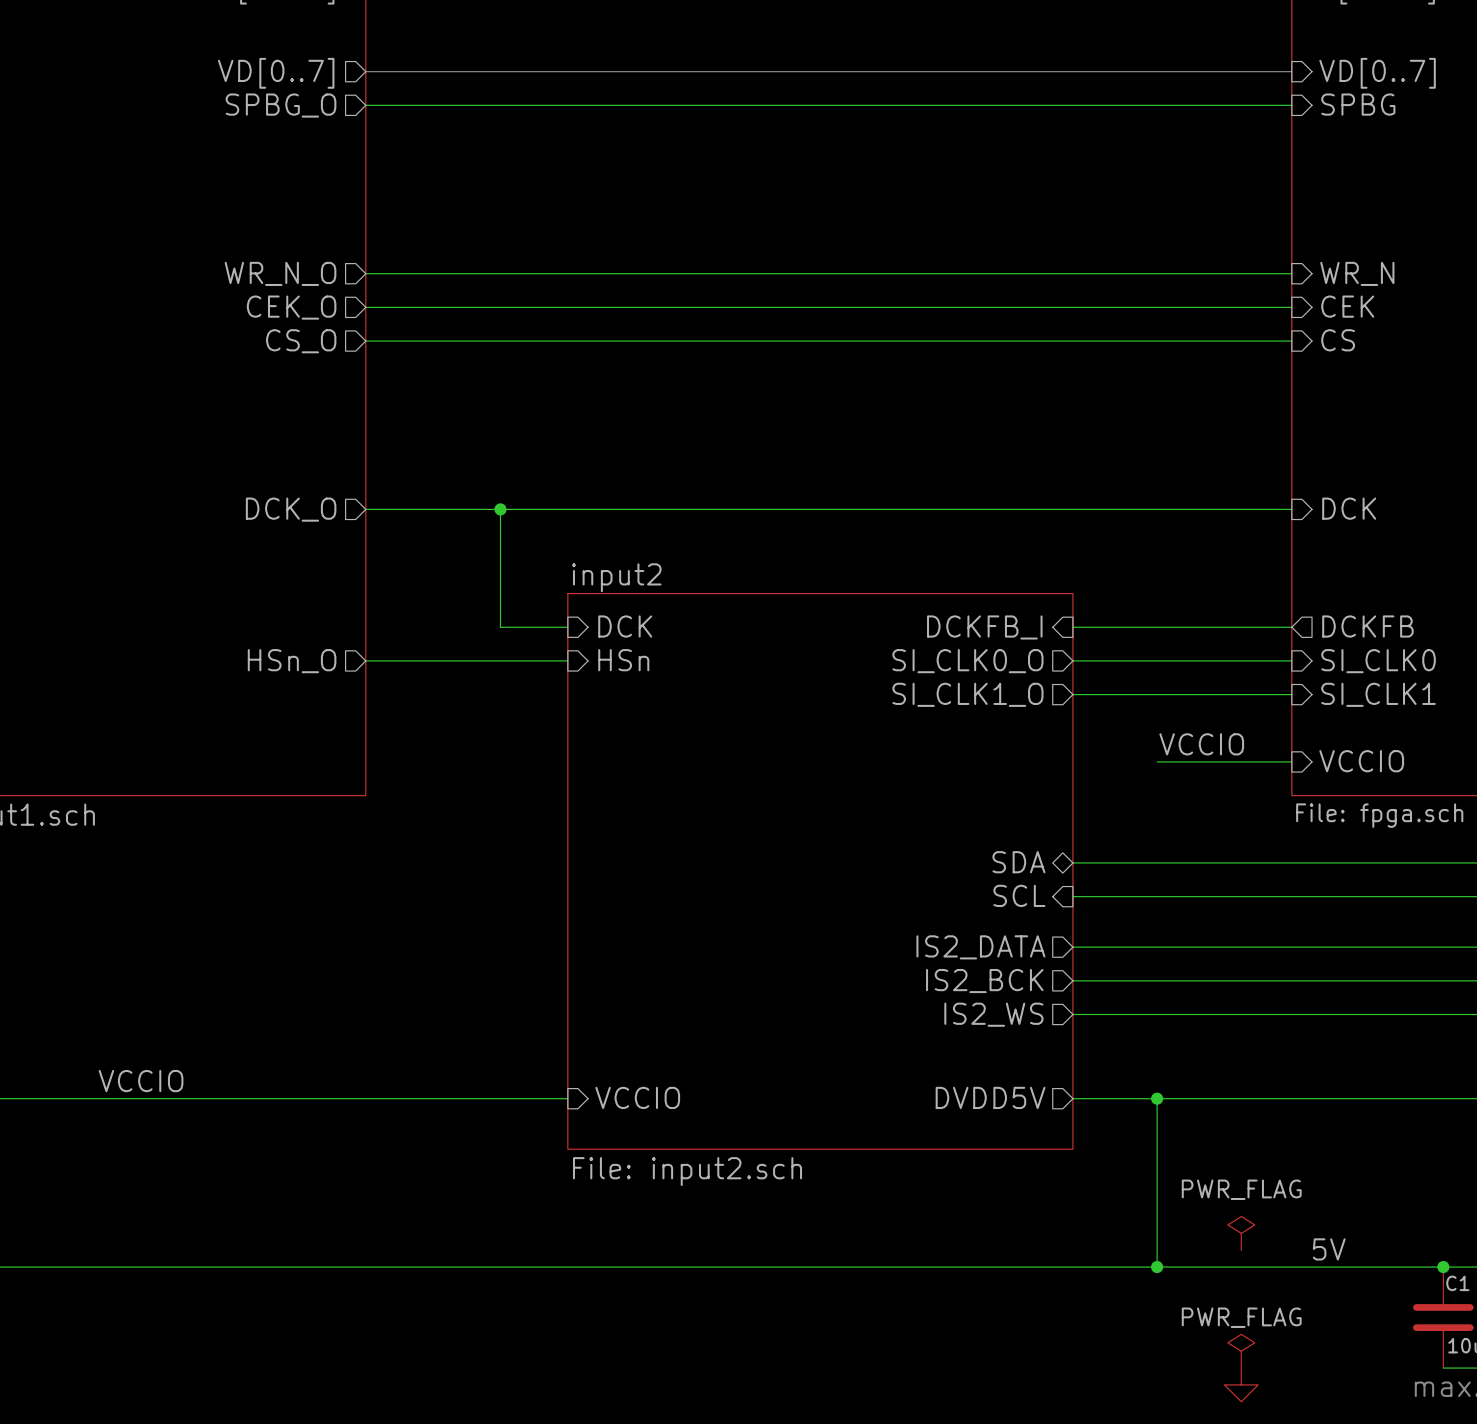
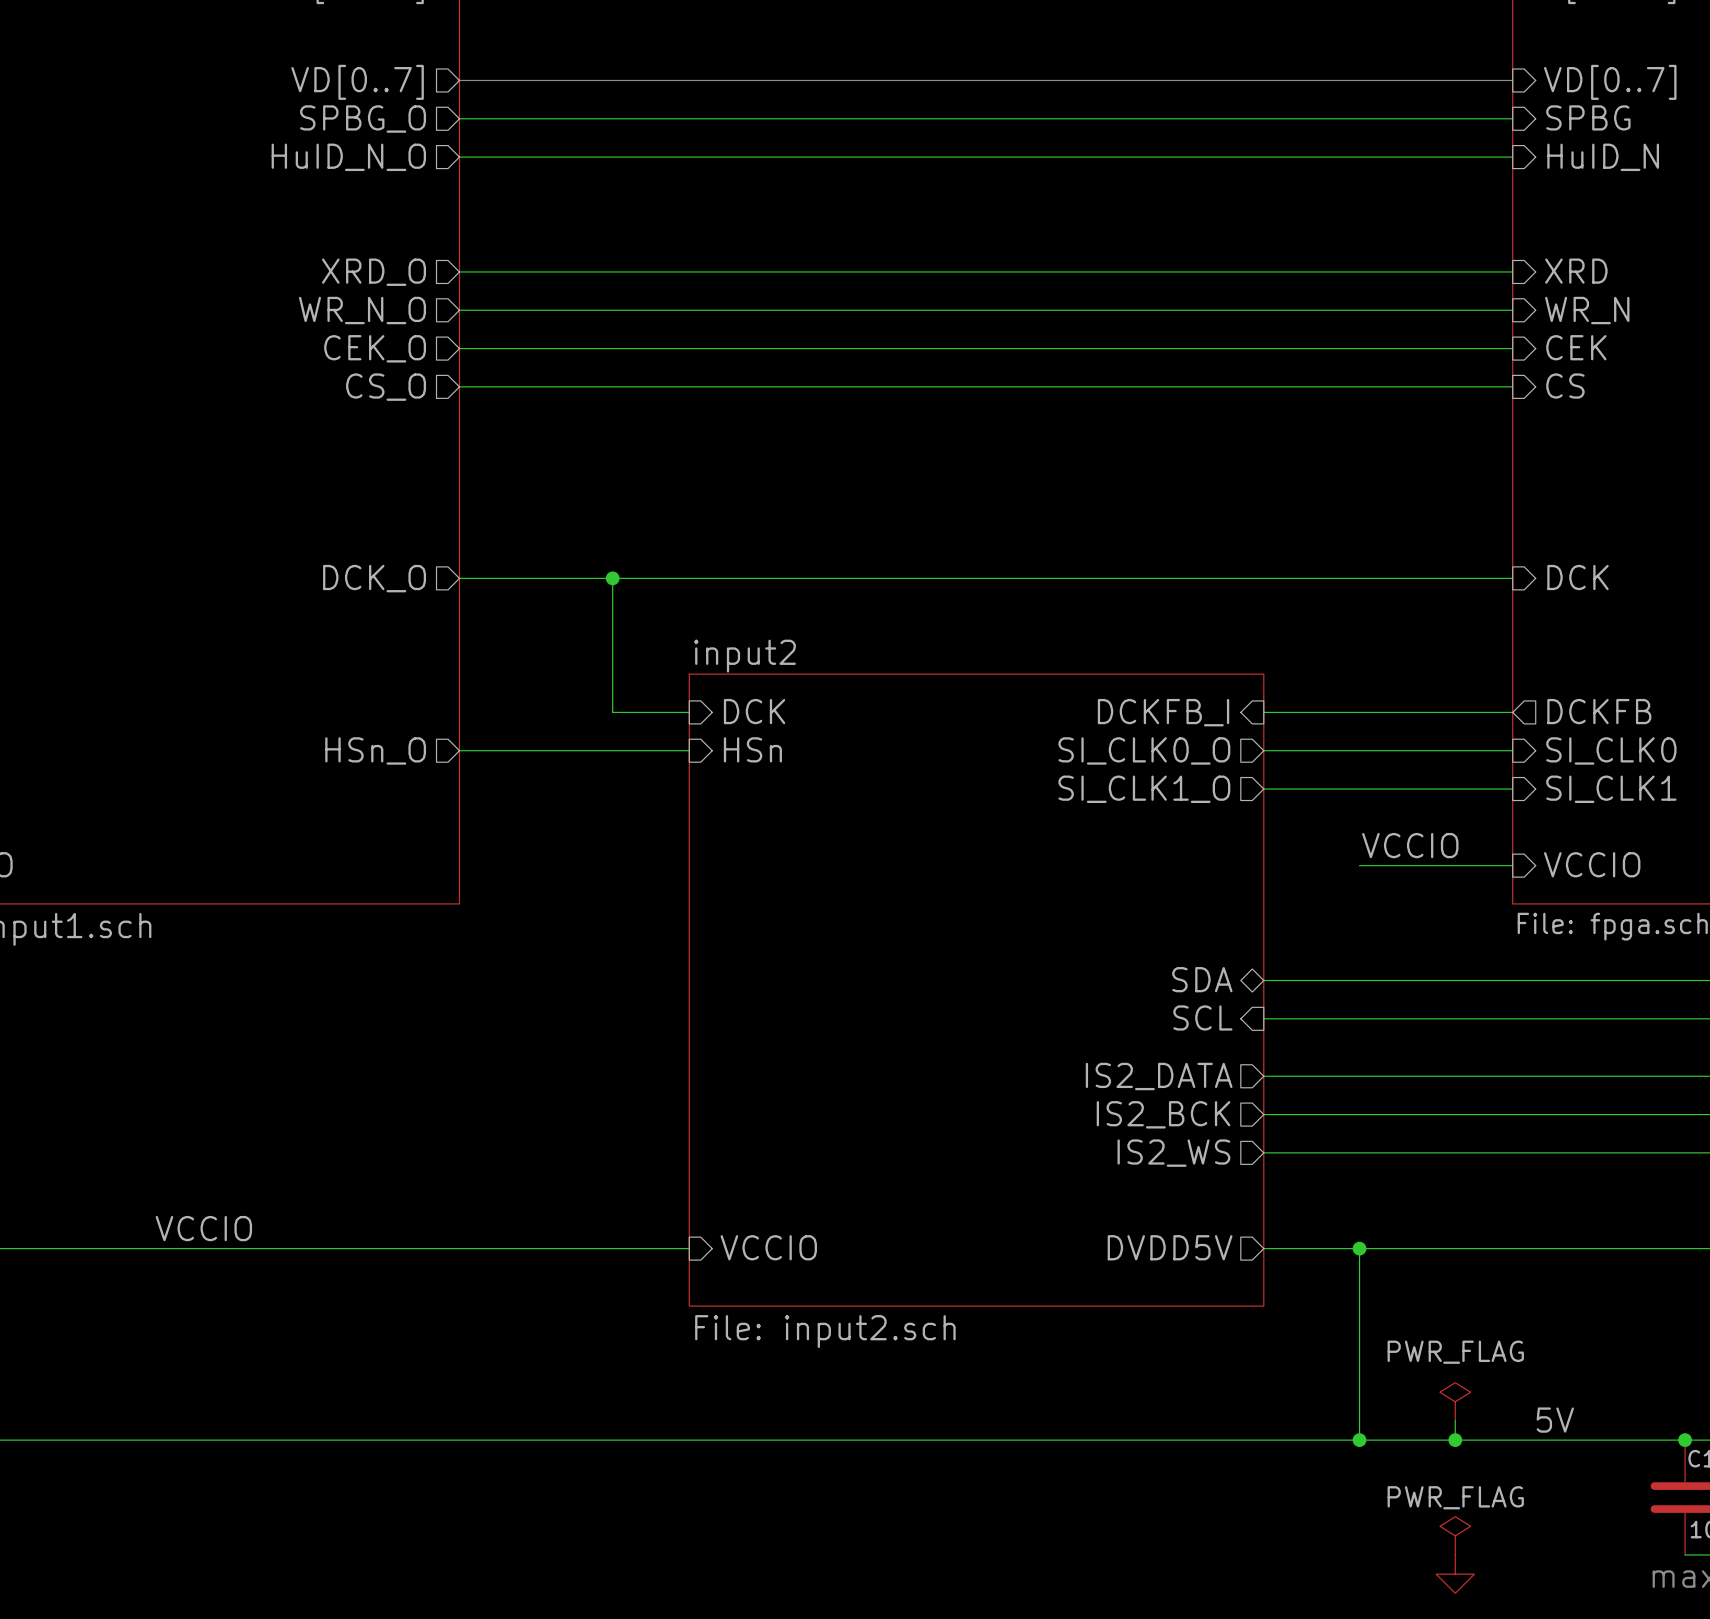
sheet pin: none -> HuID_N_O (348, 157)
wire: none -> (459, 157) (1512, 157)
sheet pin: none -> HuID_N (1603, 157)
sheet pin: none -> XRD (1576, 271)
sheet pin: none -> XRD_O (374, 272)
wire: none -> (459, 271) (1512, 271)
wire: none -> (1455, 1420) (1455, 1440)
junction: none -> (1455, 1440)

